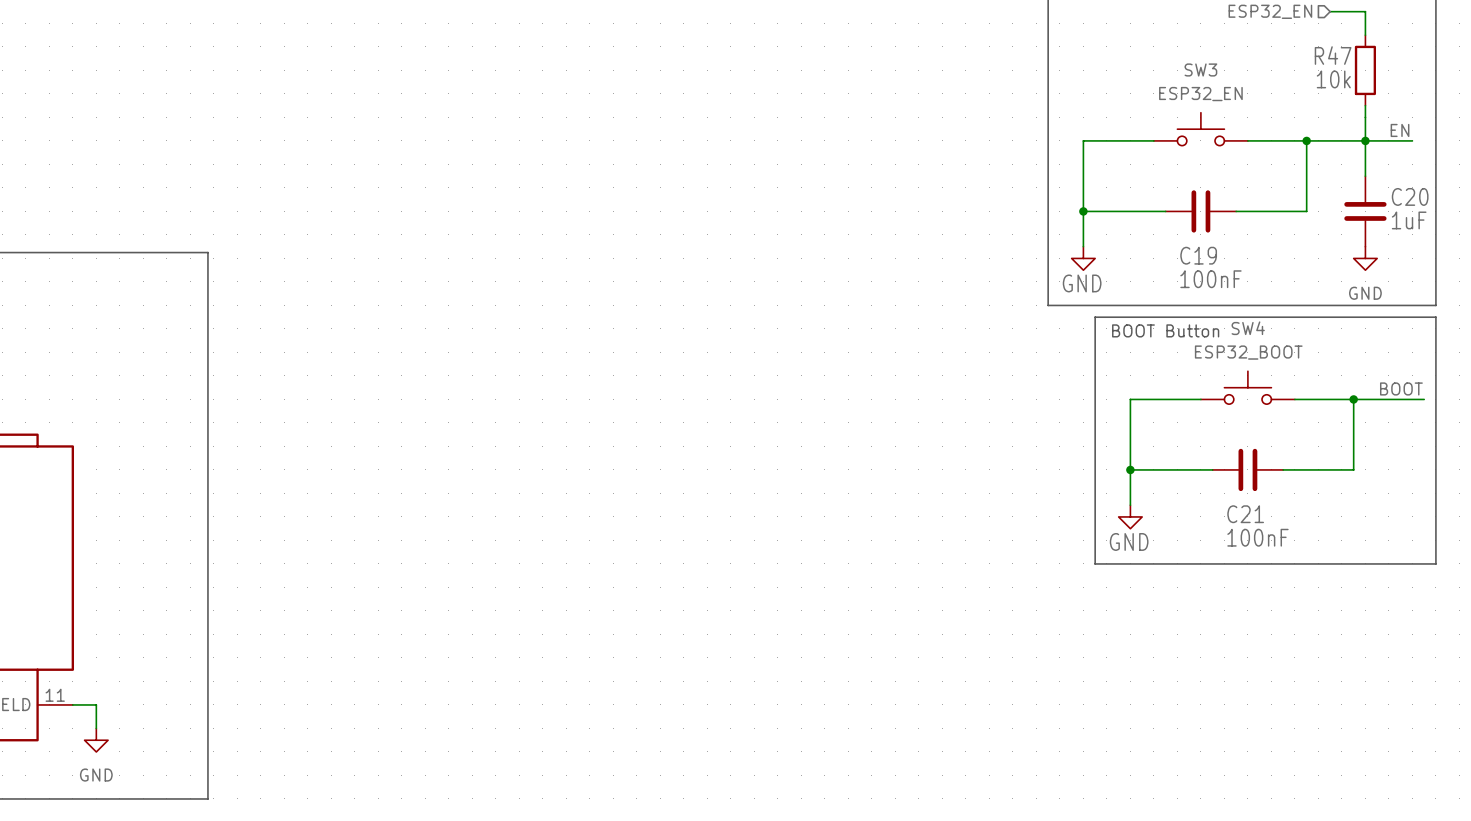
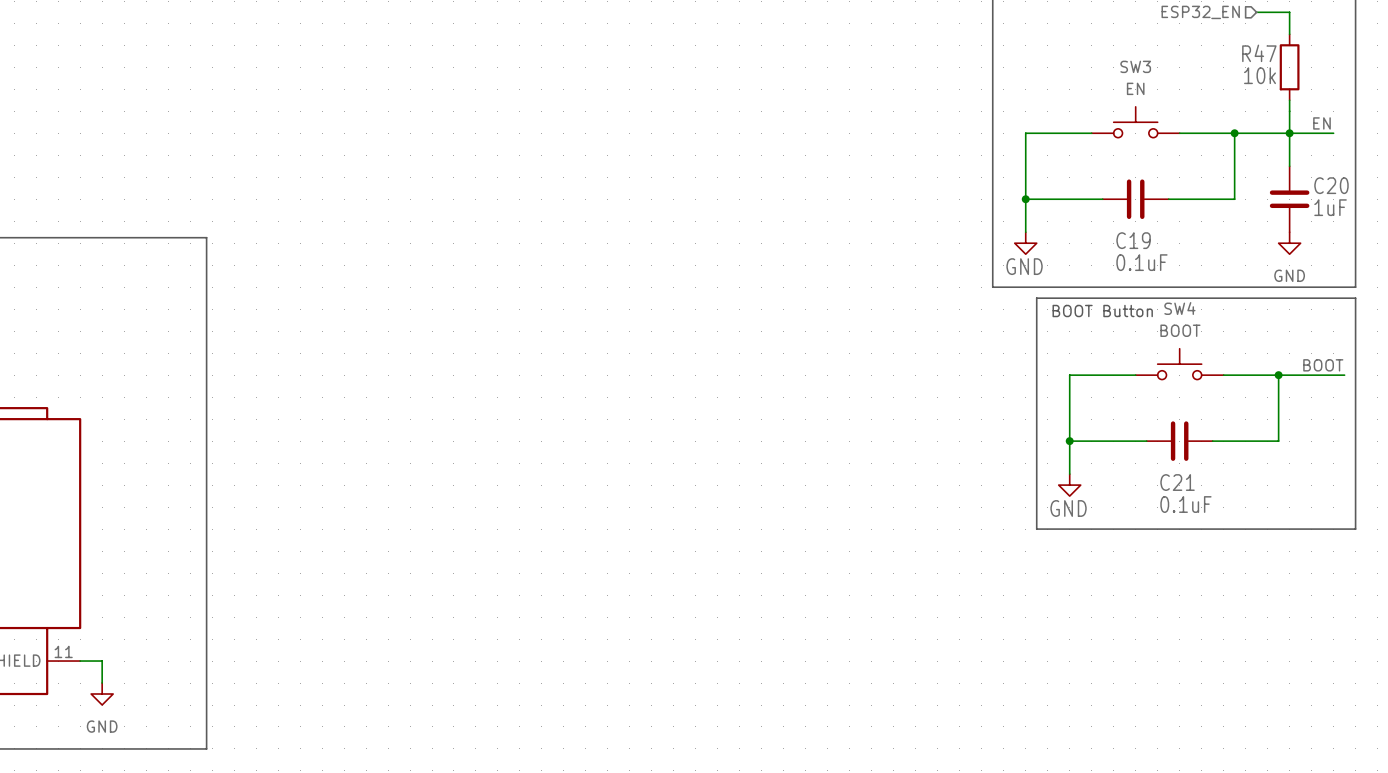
SW3 value: ESP32_EN (1200, 94) -> EN (1135, 88)
C19 value: 100nF (1210, 279) -> 0.1uF (1141, 262)
SW4 value: ESP32_BOOT (1248, 352) -> BOOT (1180, 330)
C21 value: 100nF (1257, 537) -> 0.1uF (1185, 504)

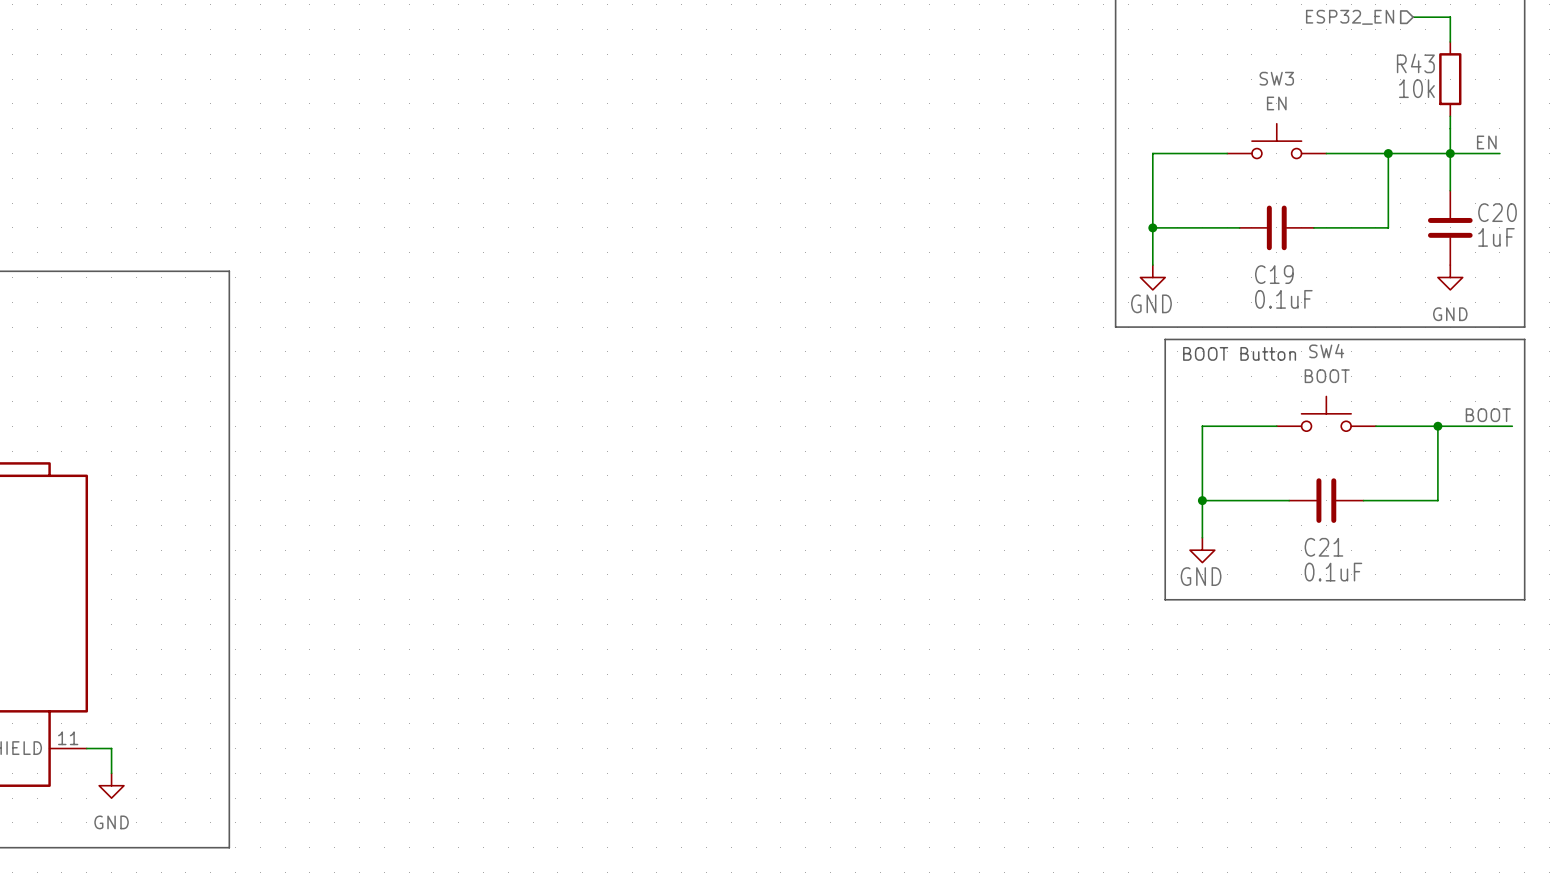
R47 name: R47 (1259, 53) -> R43 (1415, 63)

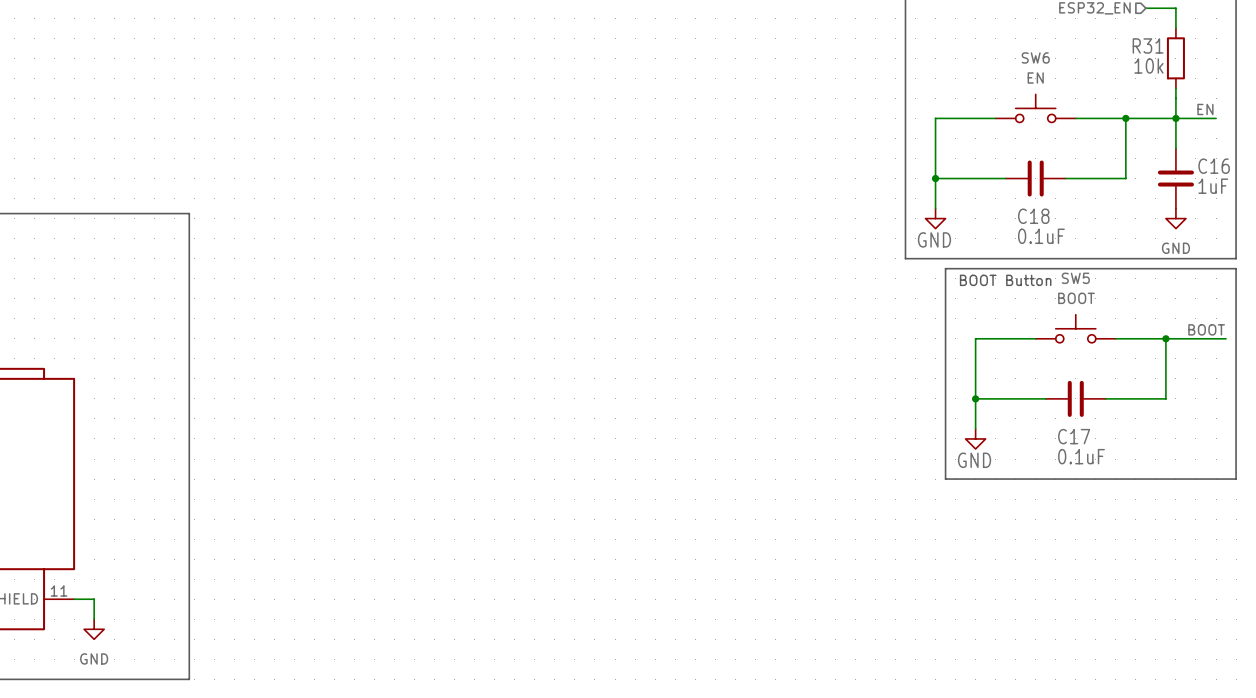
R43 name: R43 (1415, 63) -> R31 (1148, 45)
SW3 name: SW3 (1276, 78) -> SW6 (1035, 57)
C20 name: C20 (1497, 212) -> C16 (1214, 166)
C19 name: C19 (1274, 274) -> C18 (1033, 216)
SW4 name: SW4 (1326, 351) -> SW5 (1075, 278)
C21 name: C21 (1323, 547) -> C17 (1074, 436)

